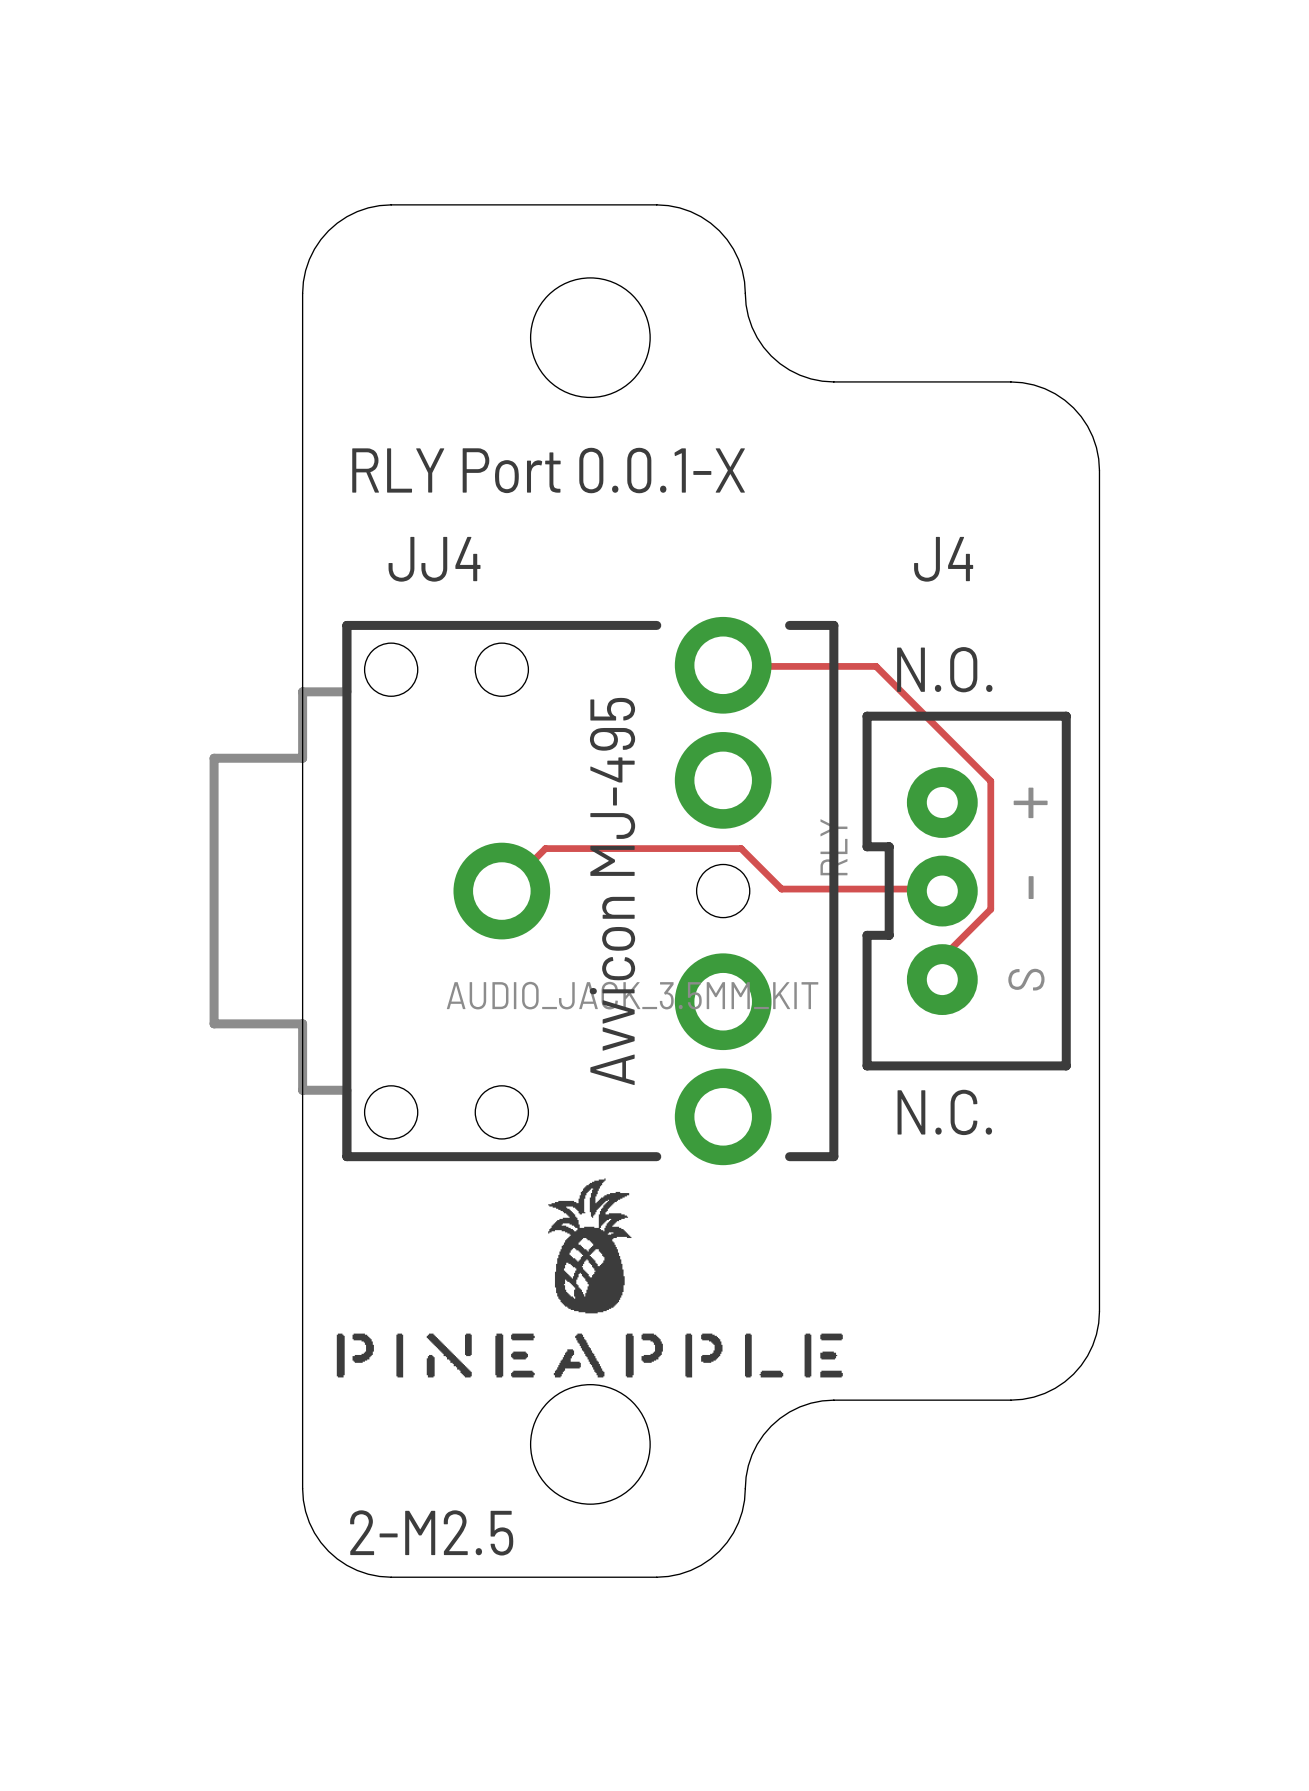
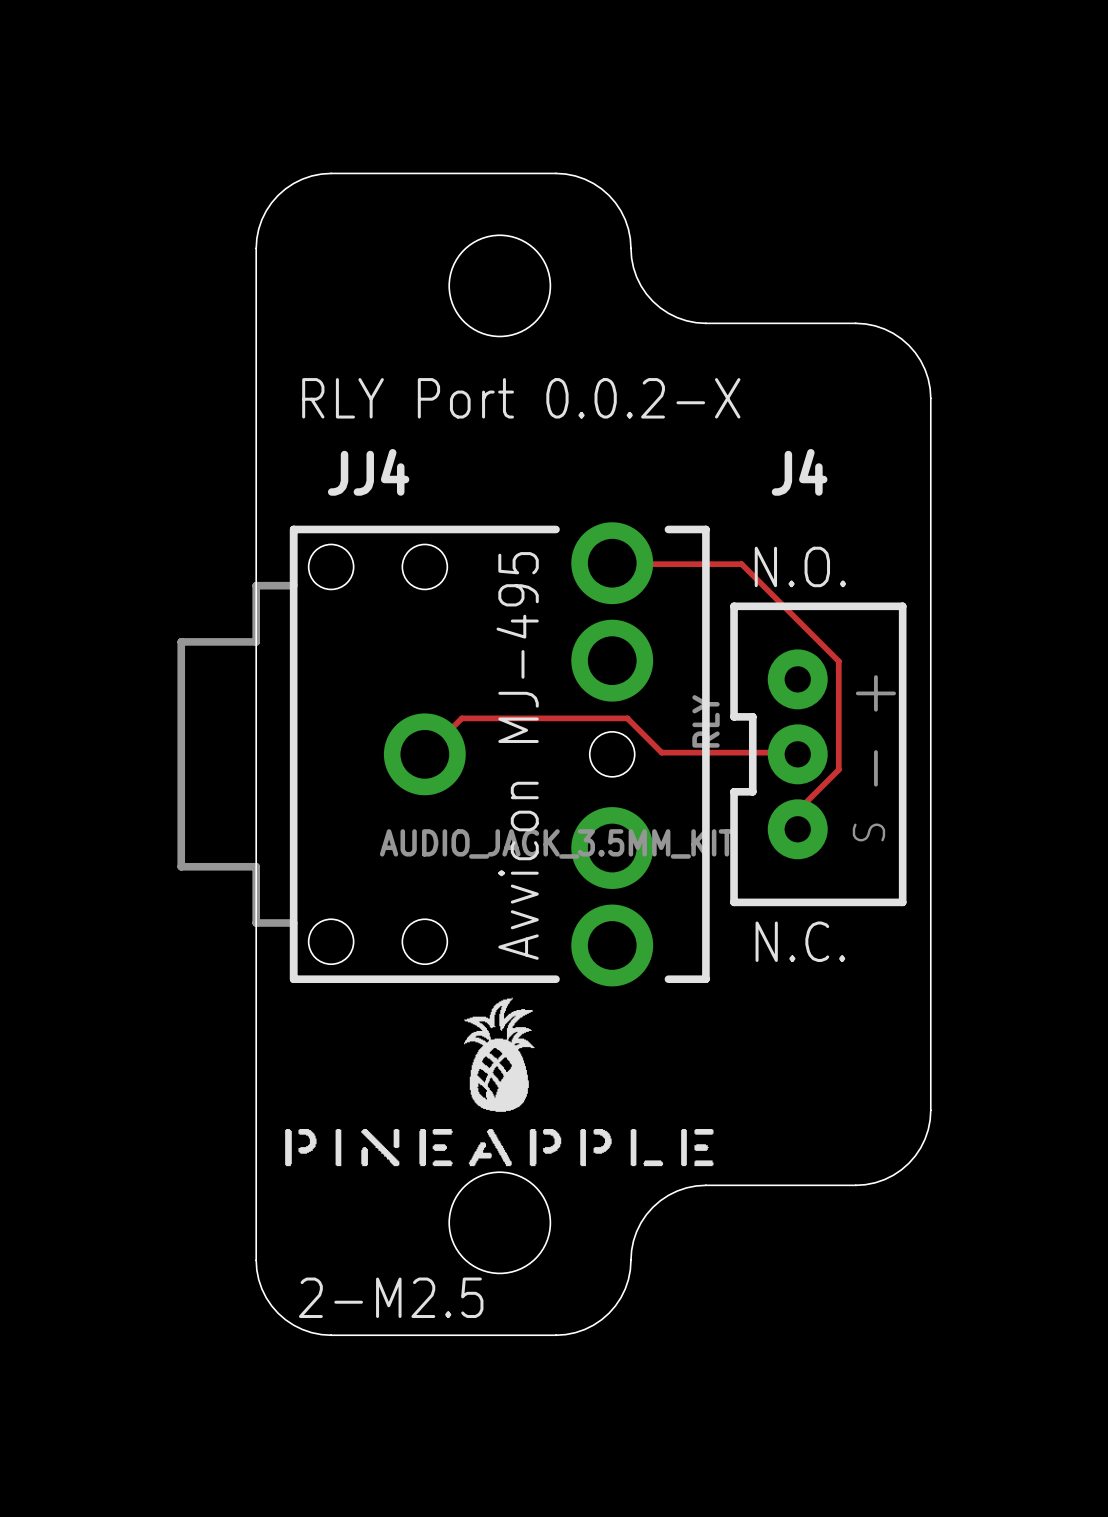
text: RLY Port 0.0.1-X (548, 470) -> RLY Port 0.0.2-X (521, 398)

